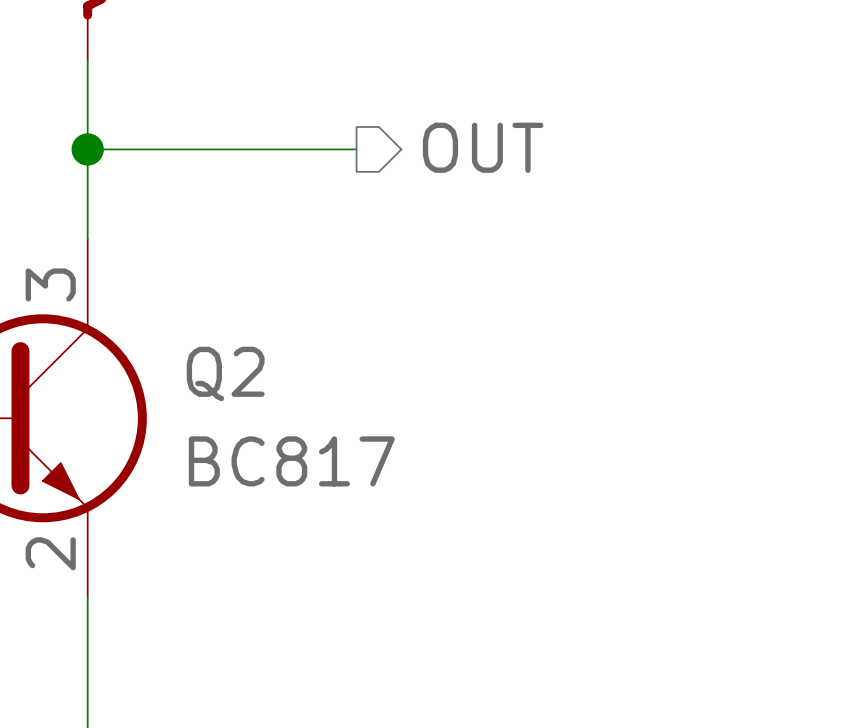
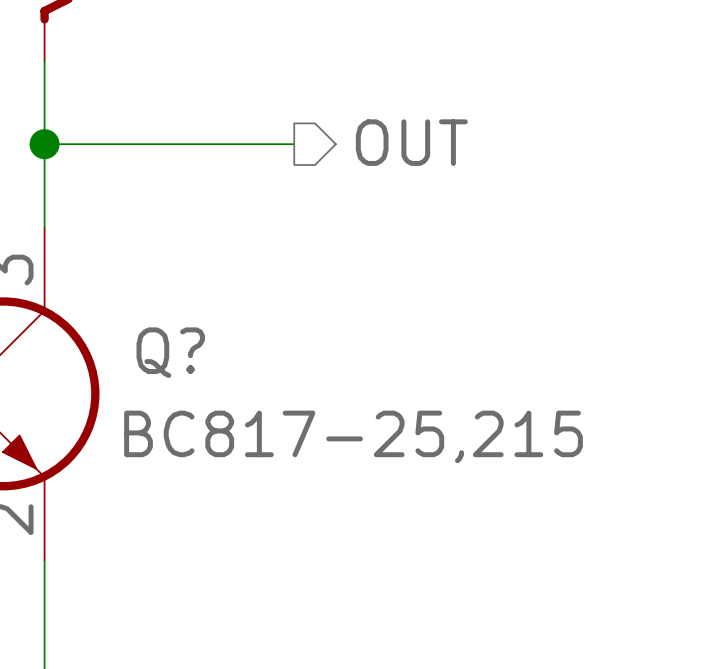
Q2 name: Q2 (225, 373) -> Q? (170, 352)
Q2 value: BC817 (291, 461) -> none
Q2 text: none -> BC817-25,215 (353, 436)

